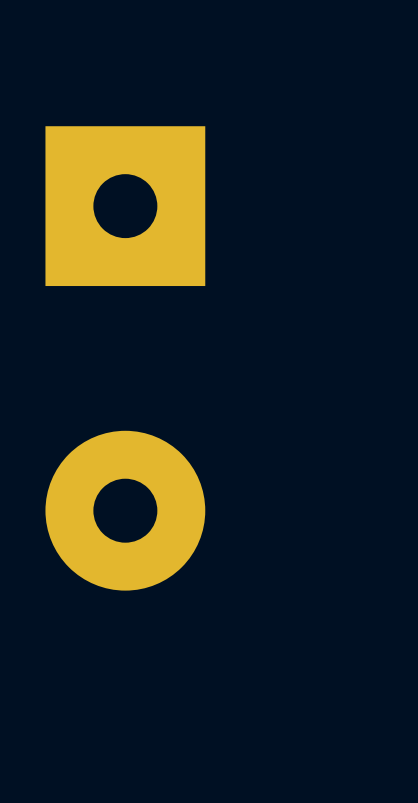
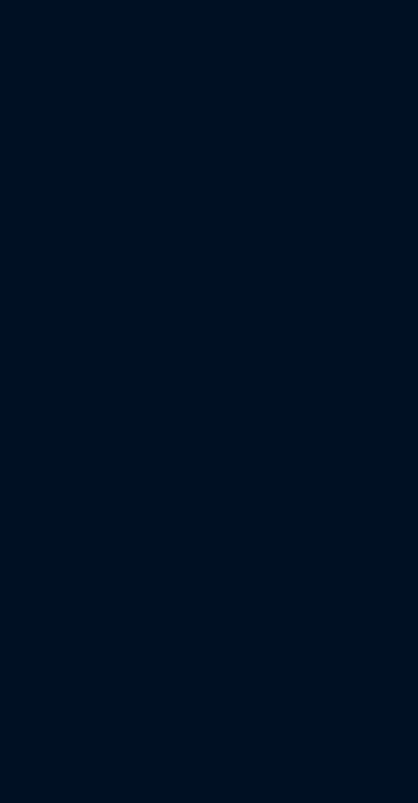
part: (125, 358) -> none

